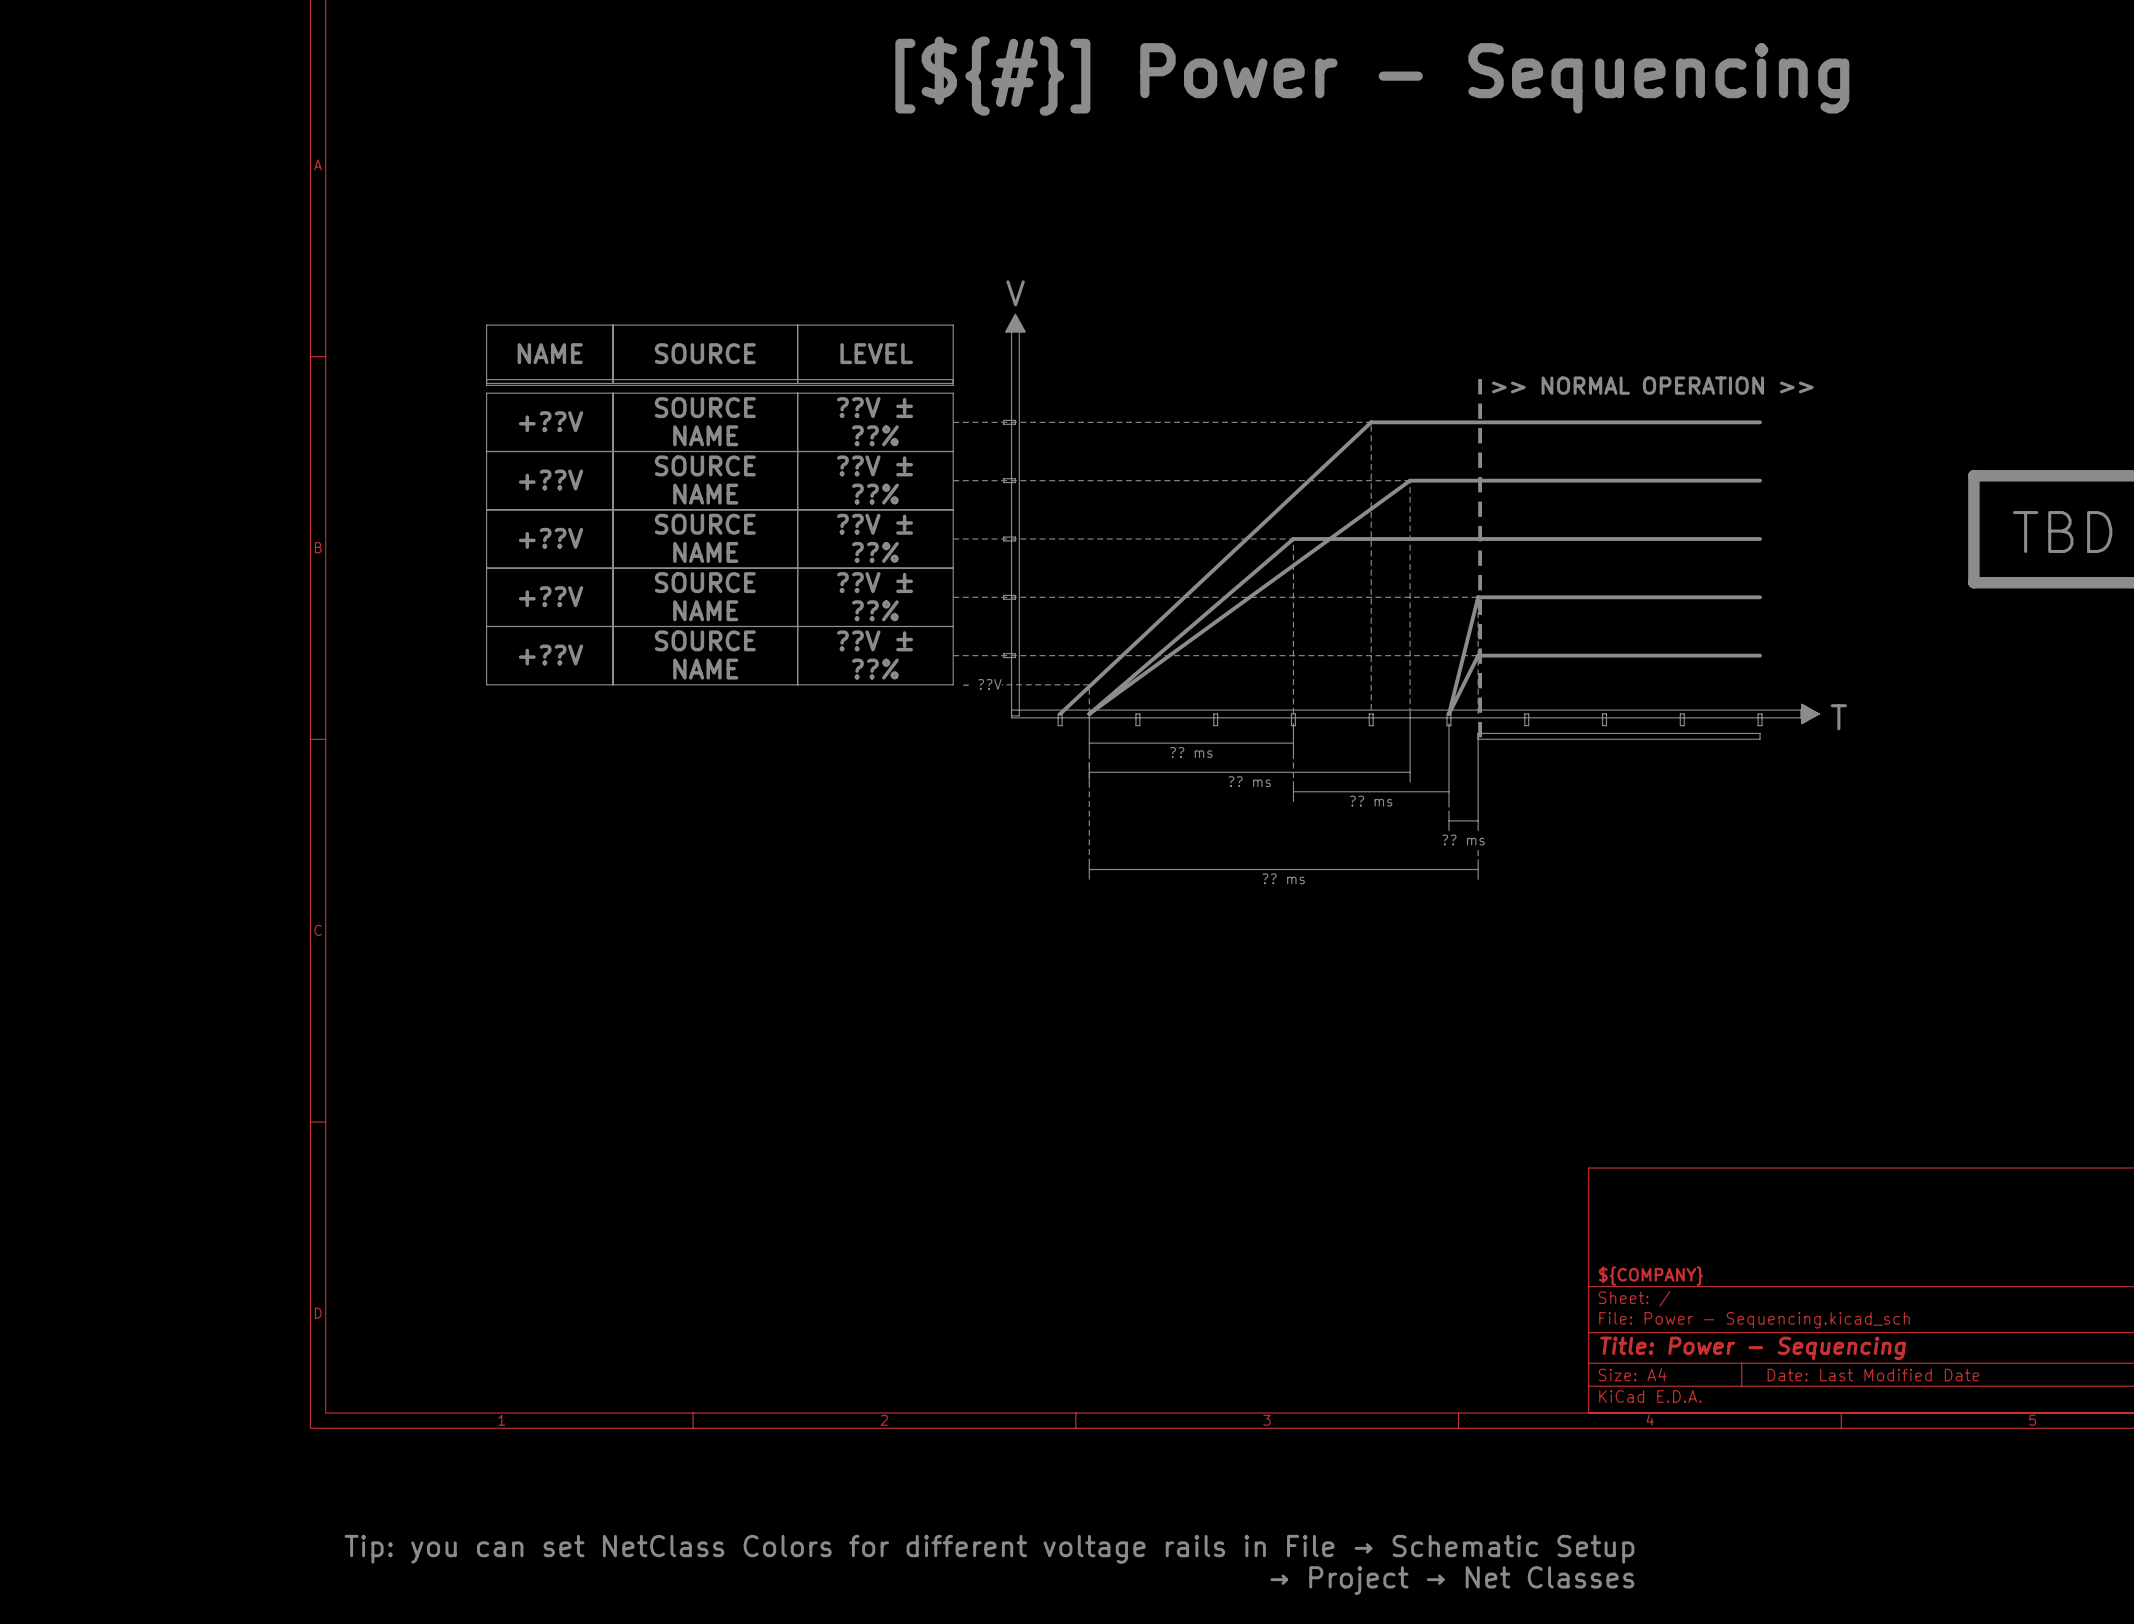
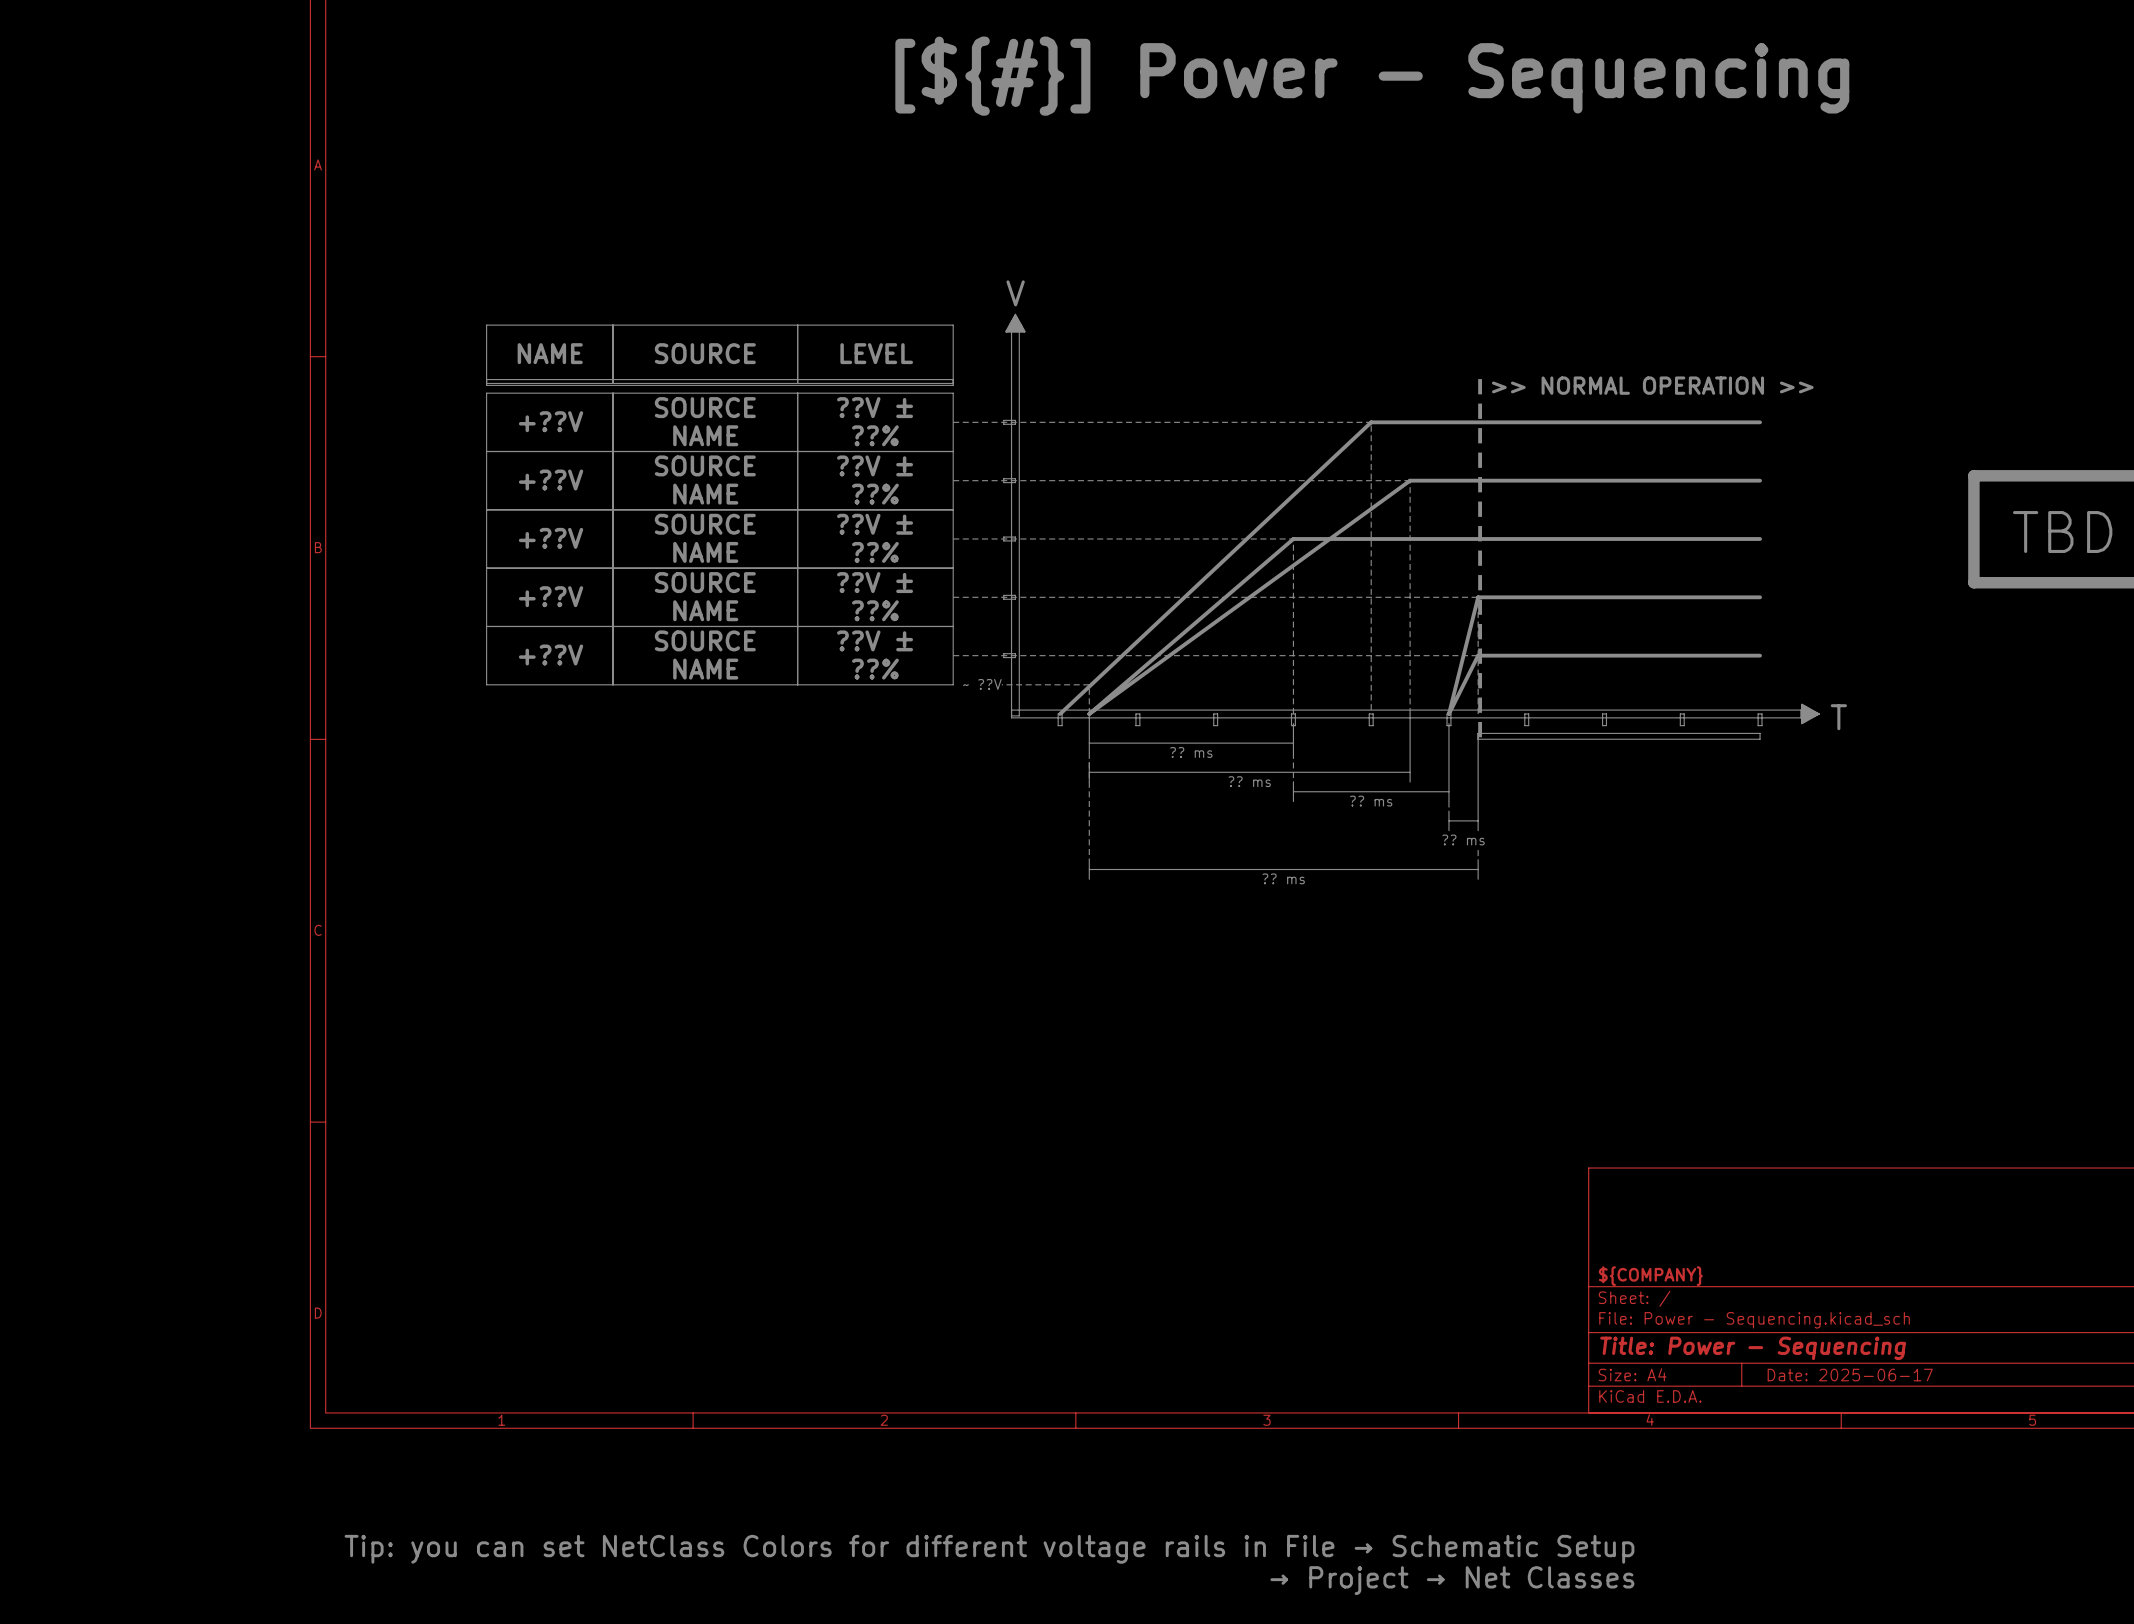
title block: Date: Last Modified Date (1873, 1375) -> Date: 2025-06-17 (1850, 1375)

